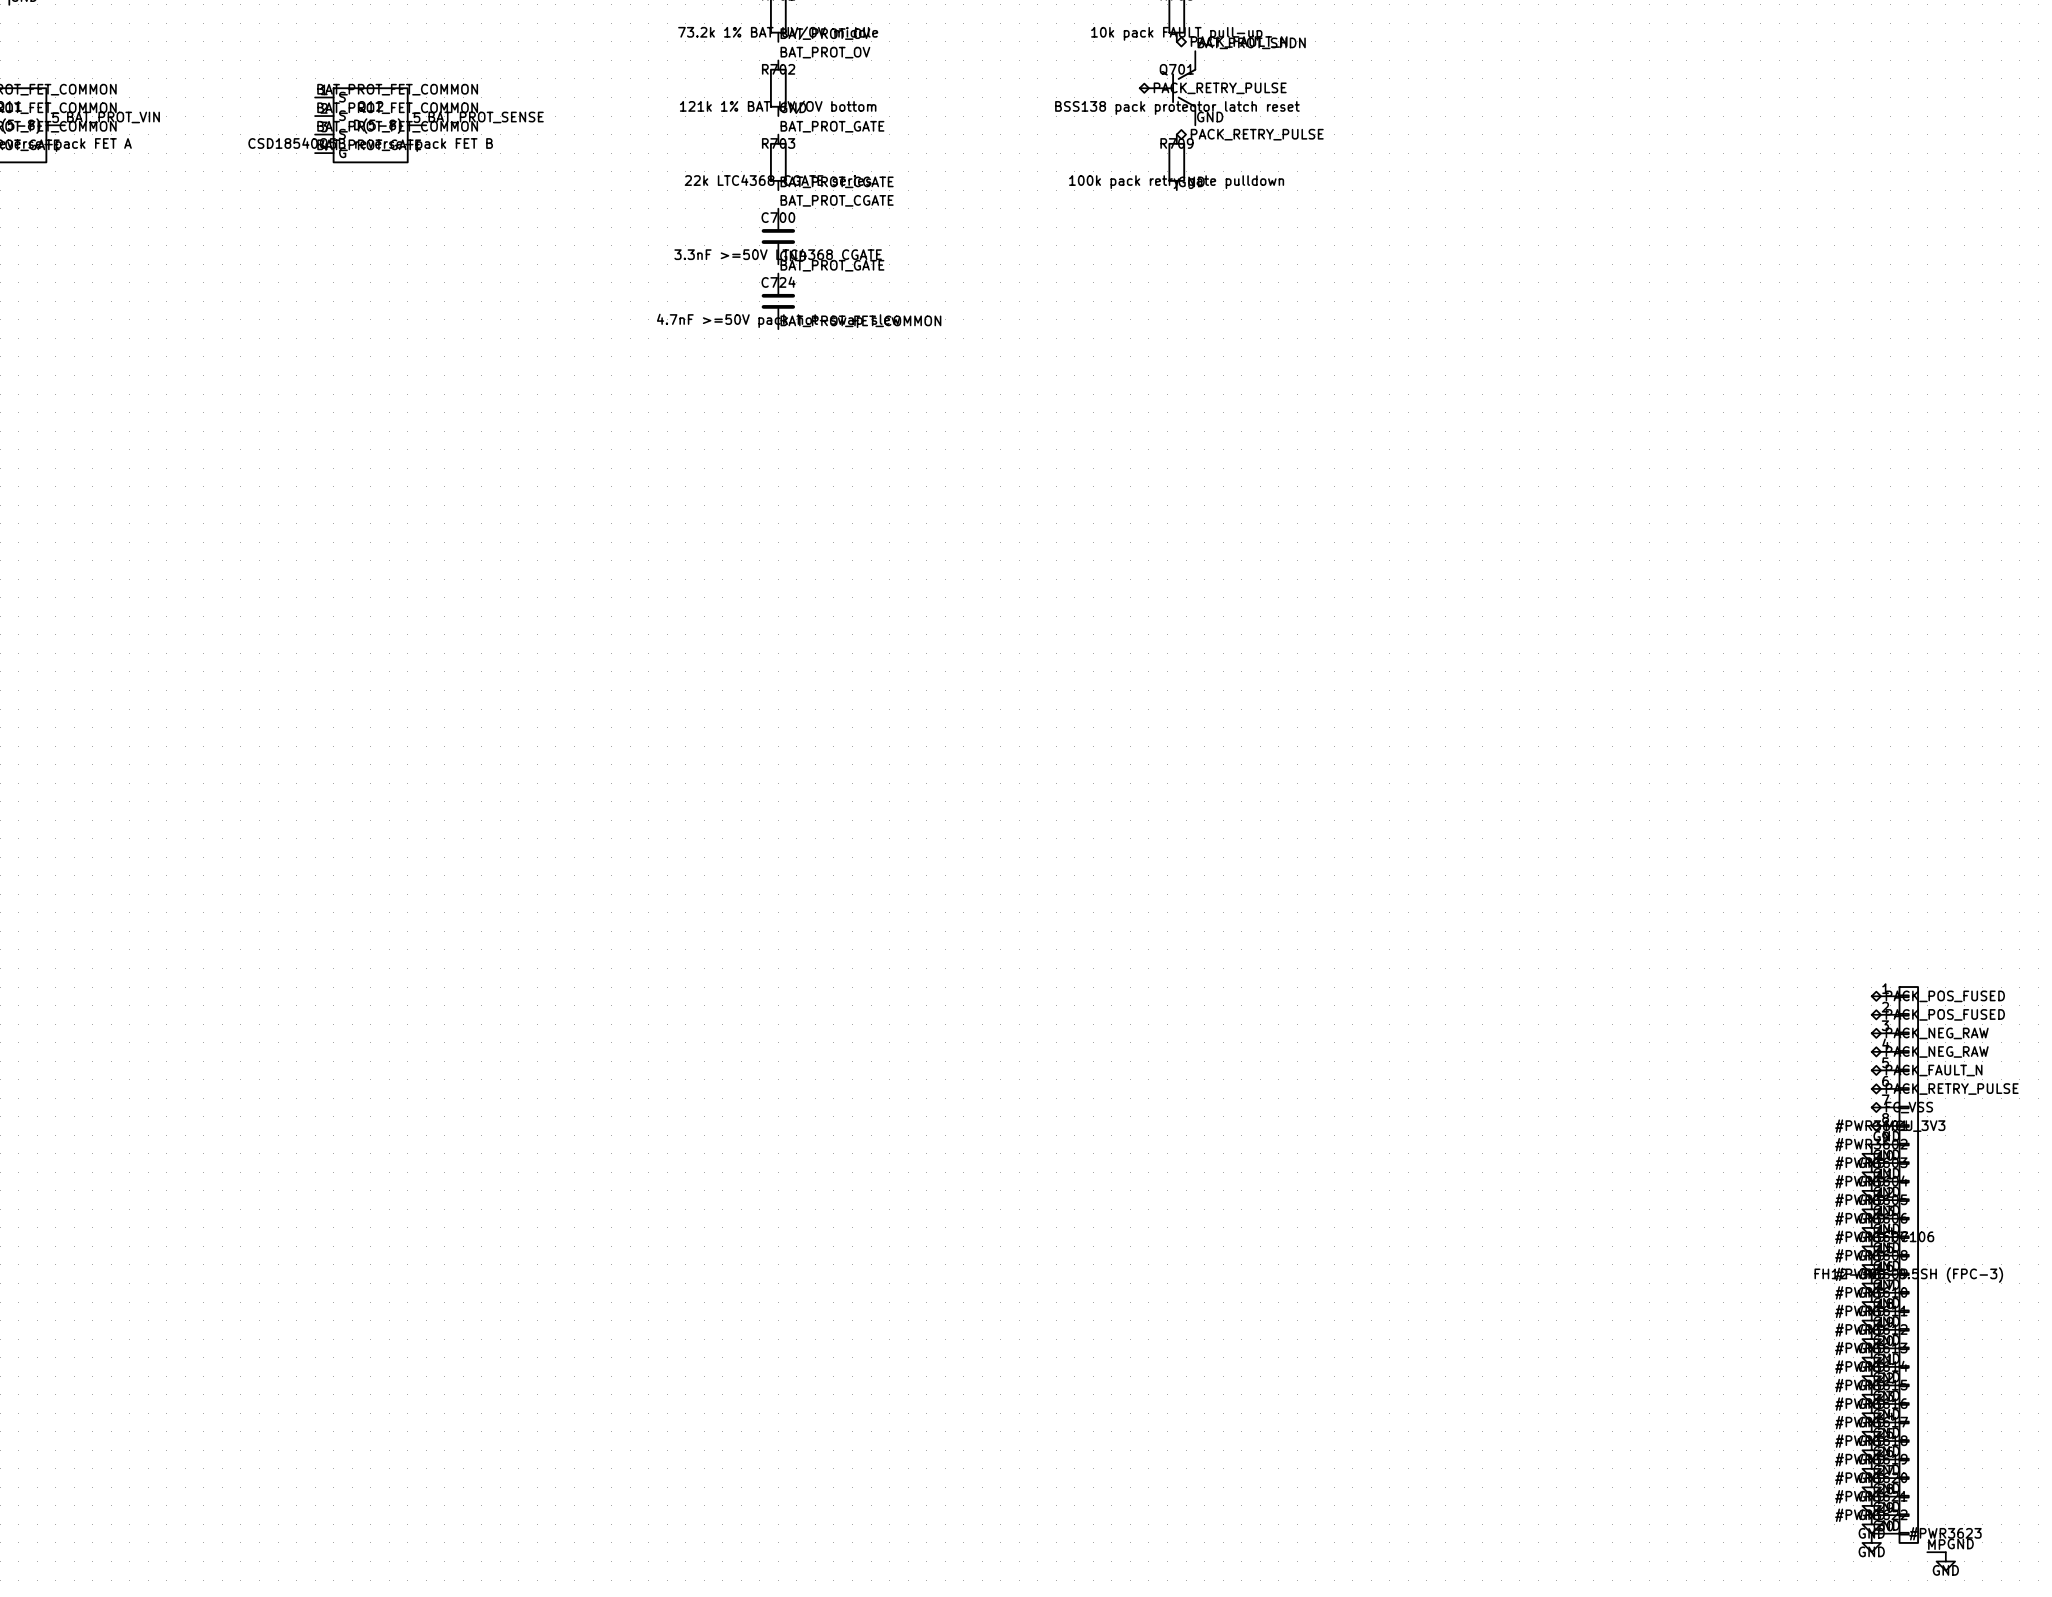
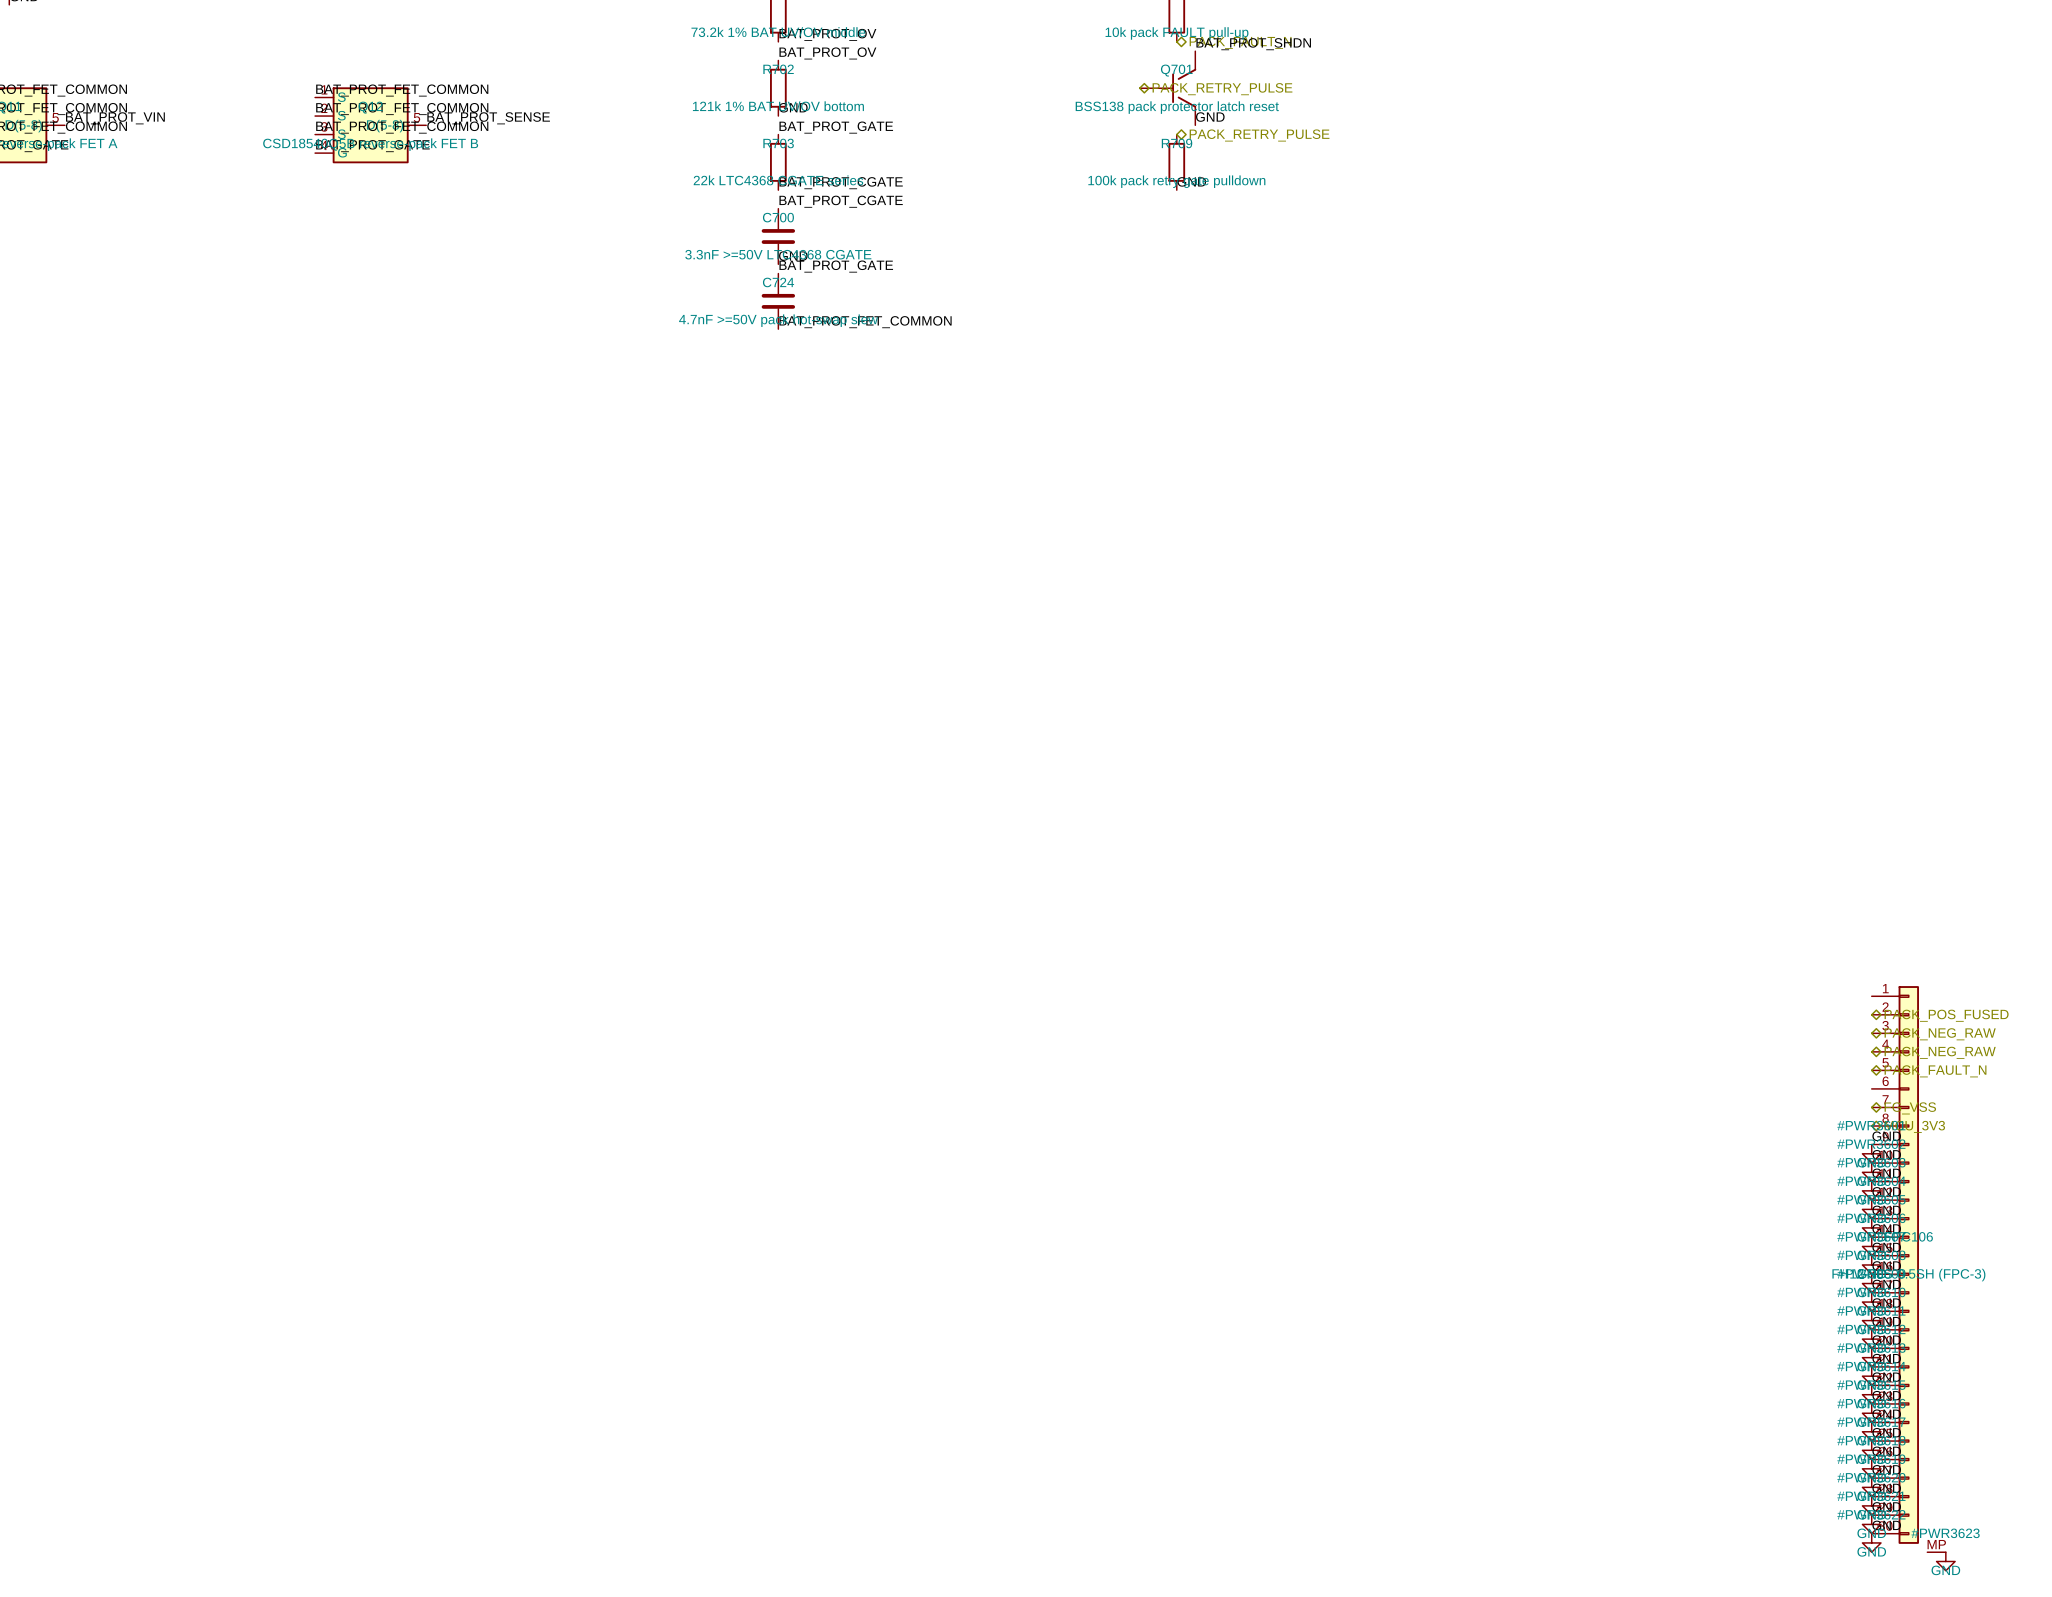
hierarchical label: PACK_POS_FUSED (1945, 996) -> none
hierarchical label: PACK_RETRY_PULSE (1952, 1089) -> none
label: GND (1960, 1543) -> none

